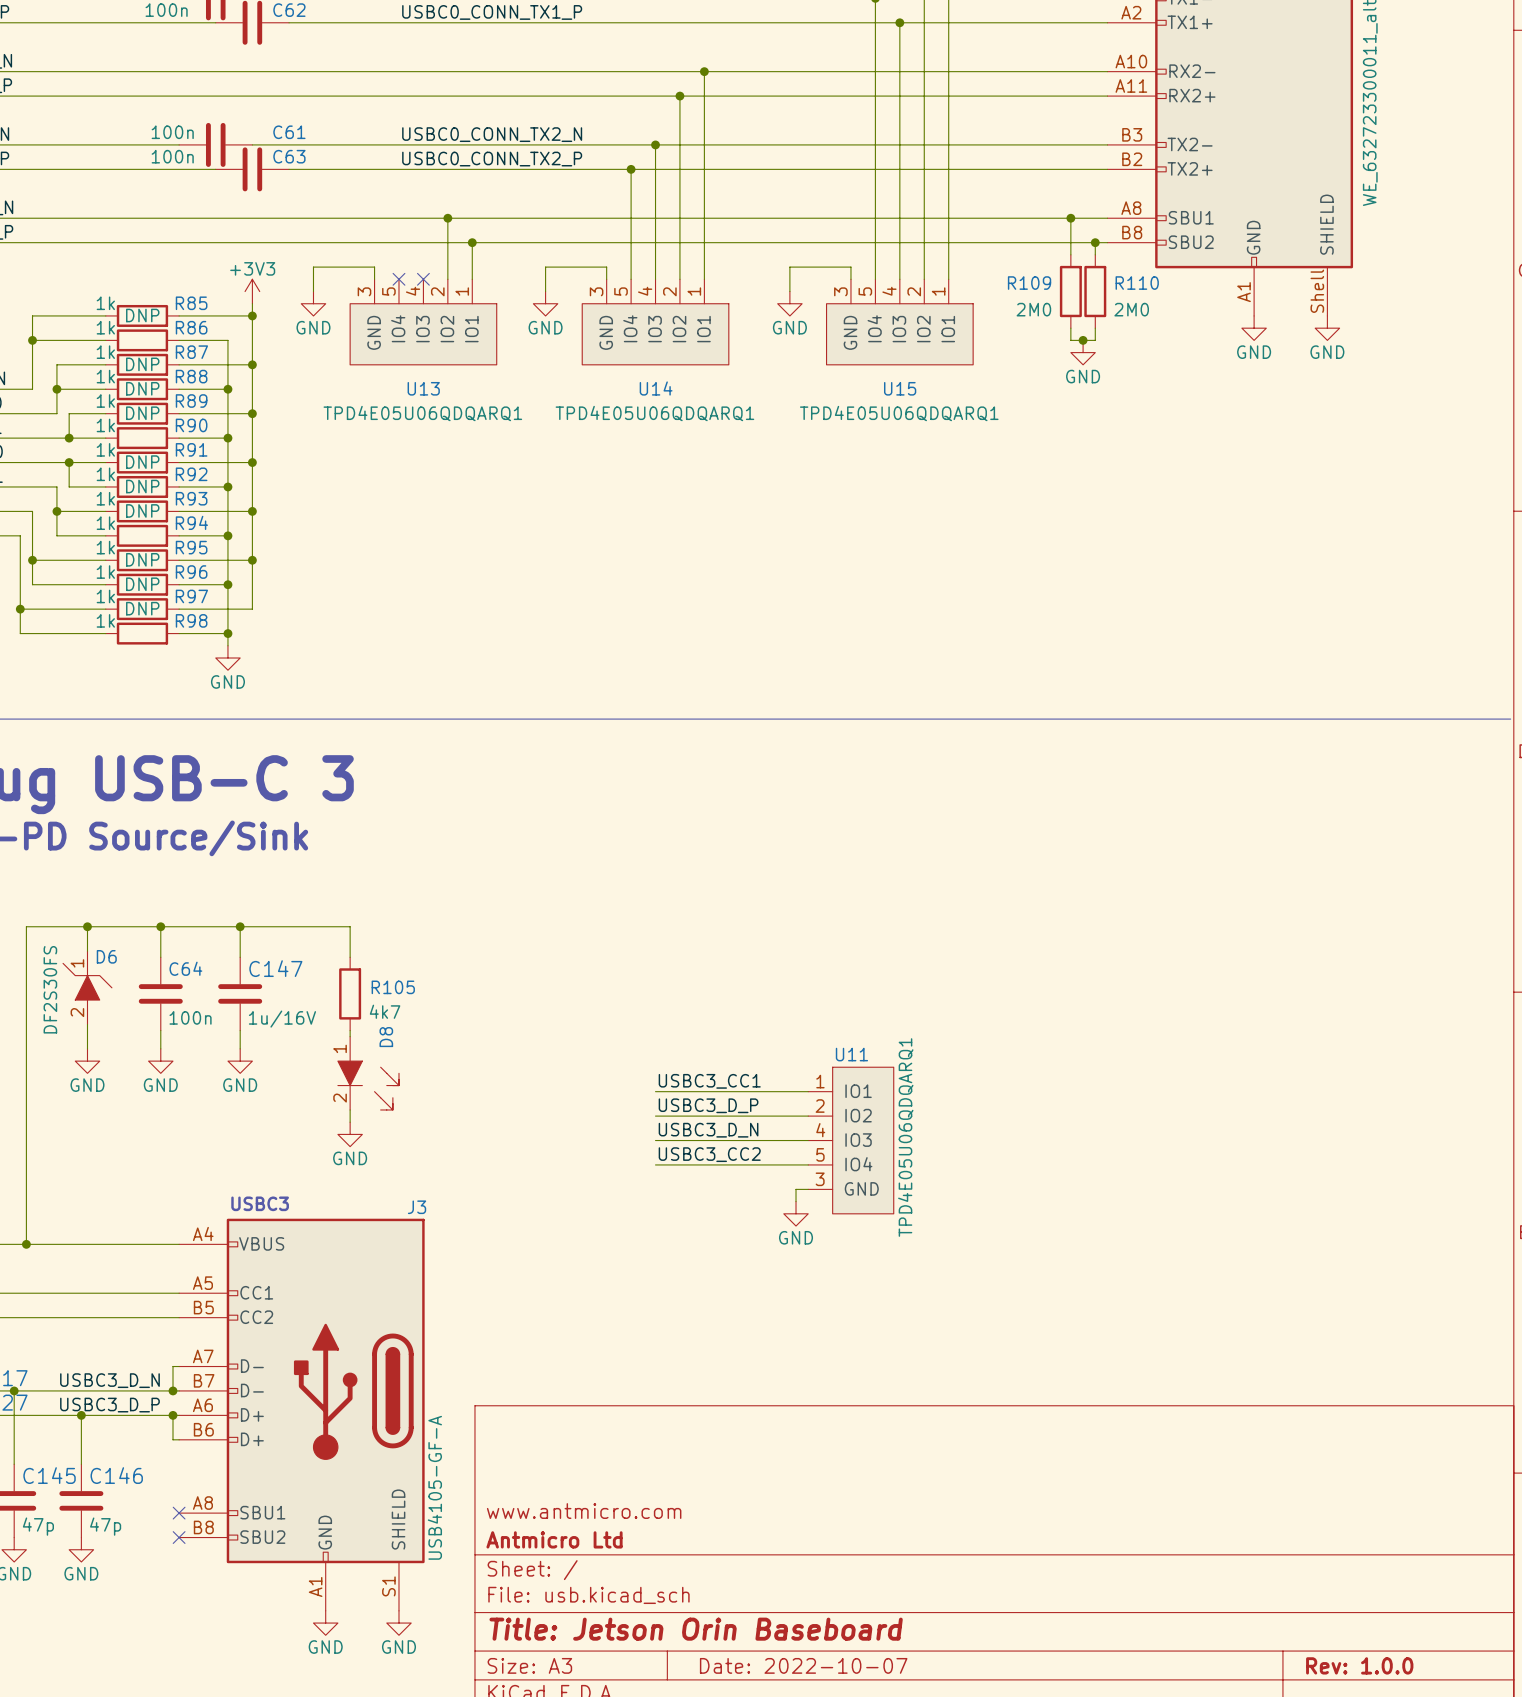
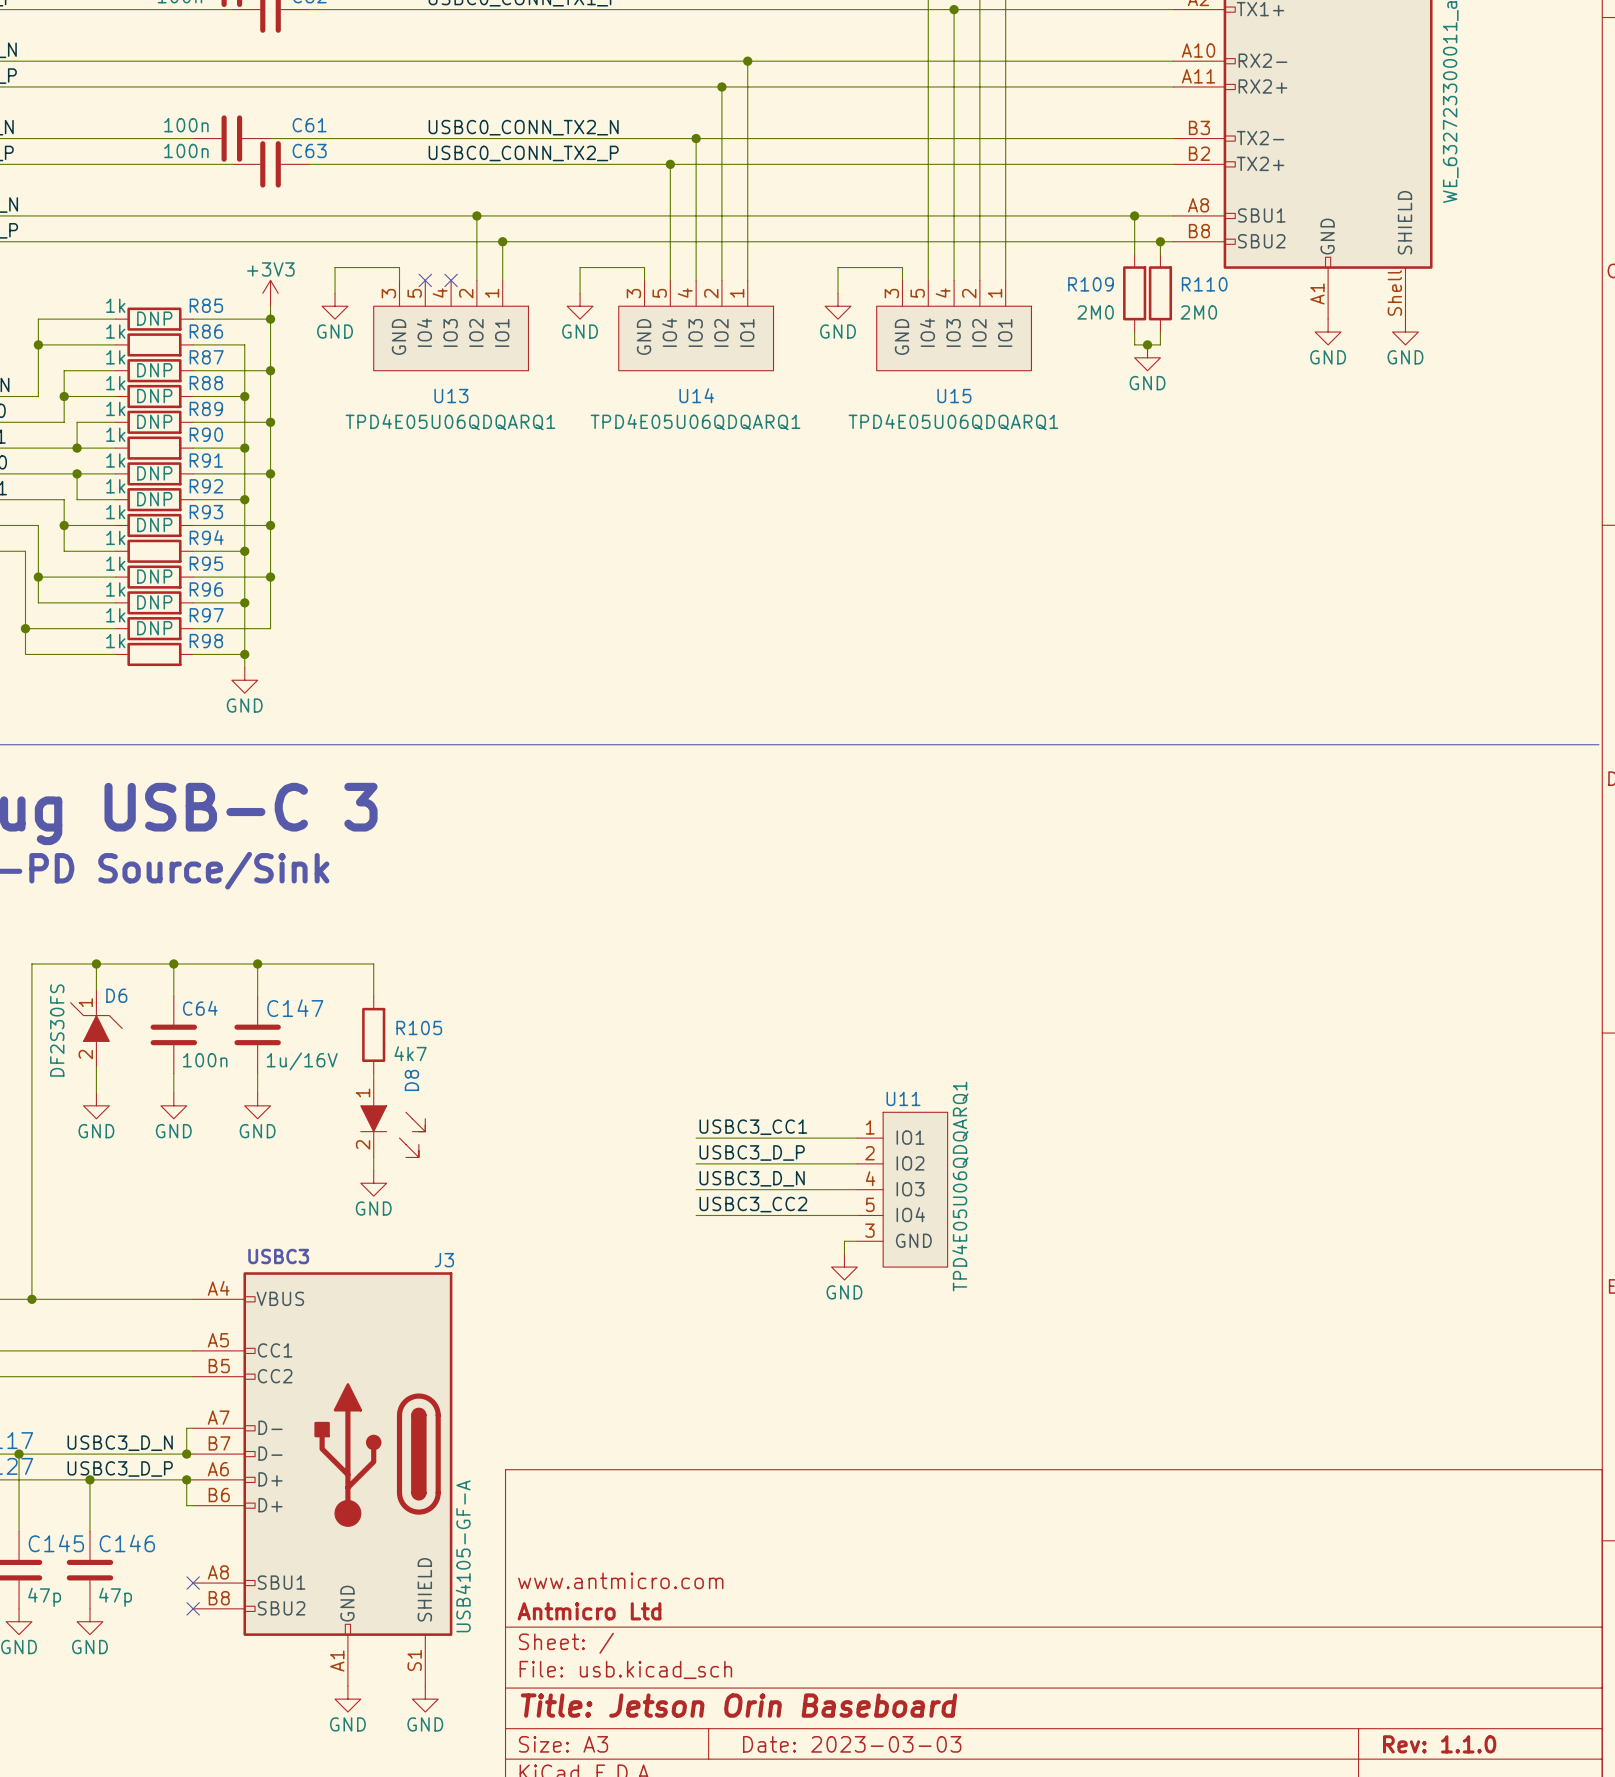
title block: Date: 2022-10-07 (803, 1665) -> Date: 2023-03-03 (852, 1744)
title block: Rev: 1.0.0 (1359, 1665) -> Rev: 1.1.0 (1439, 1744)

